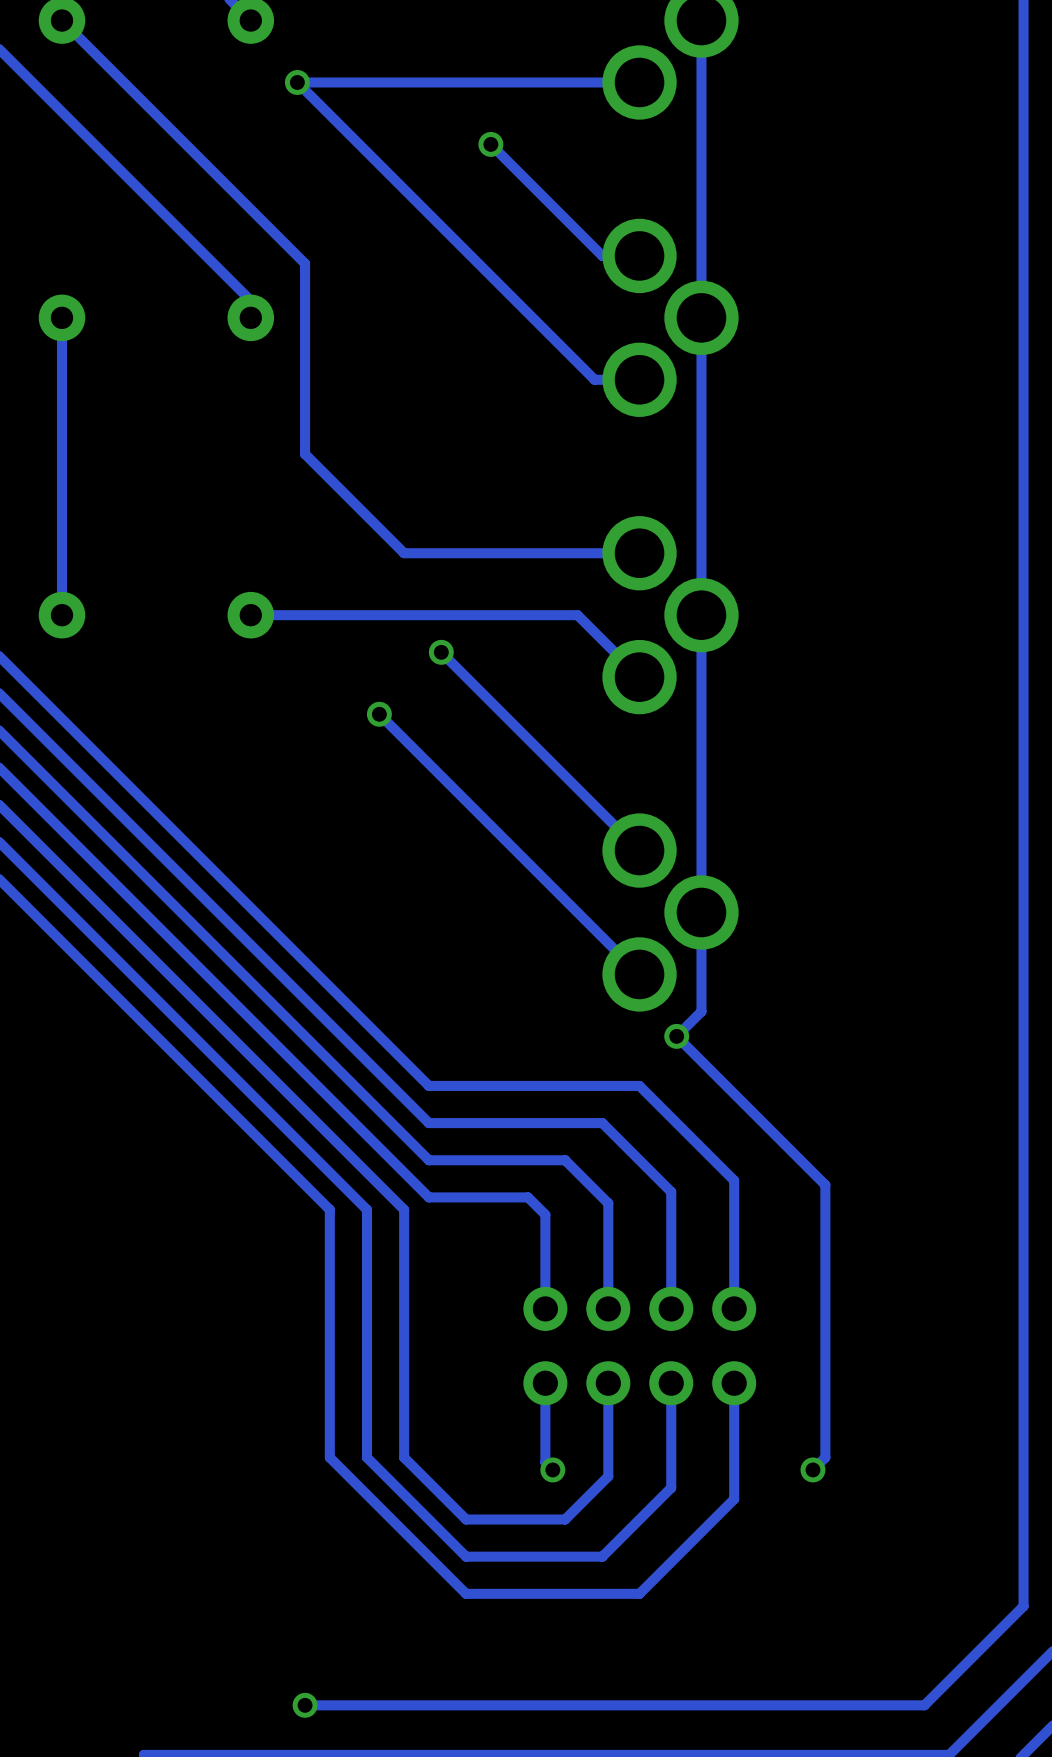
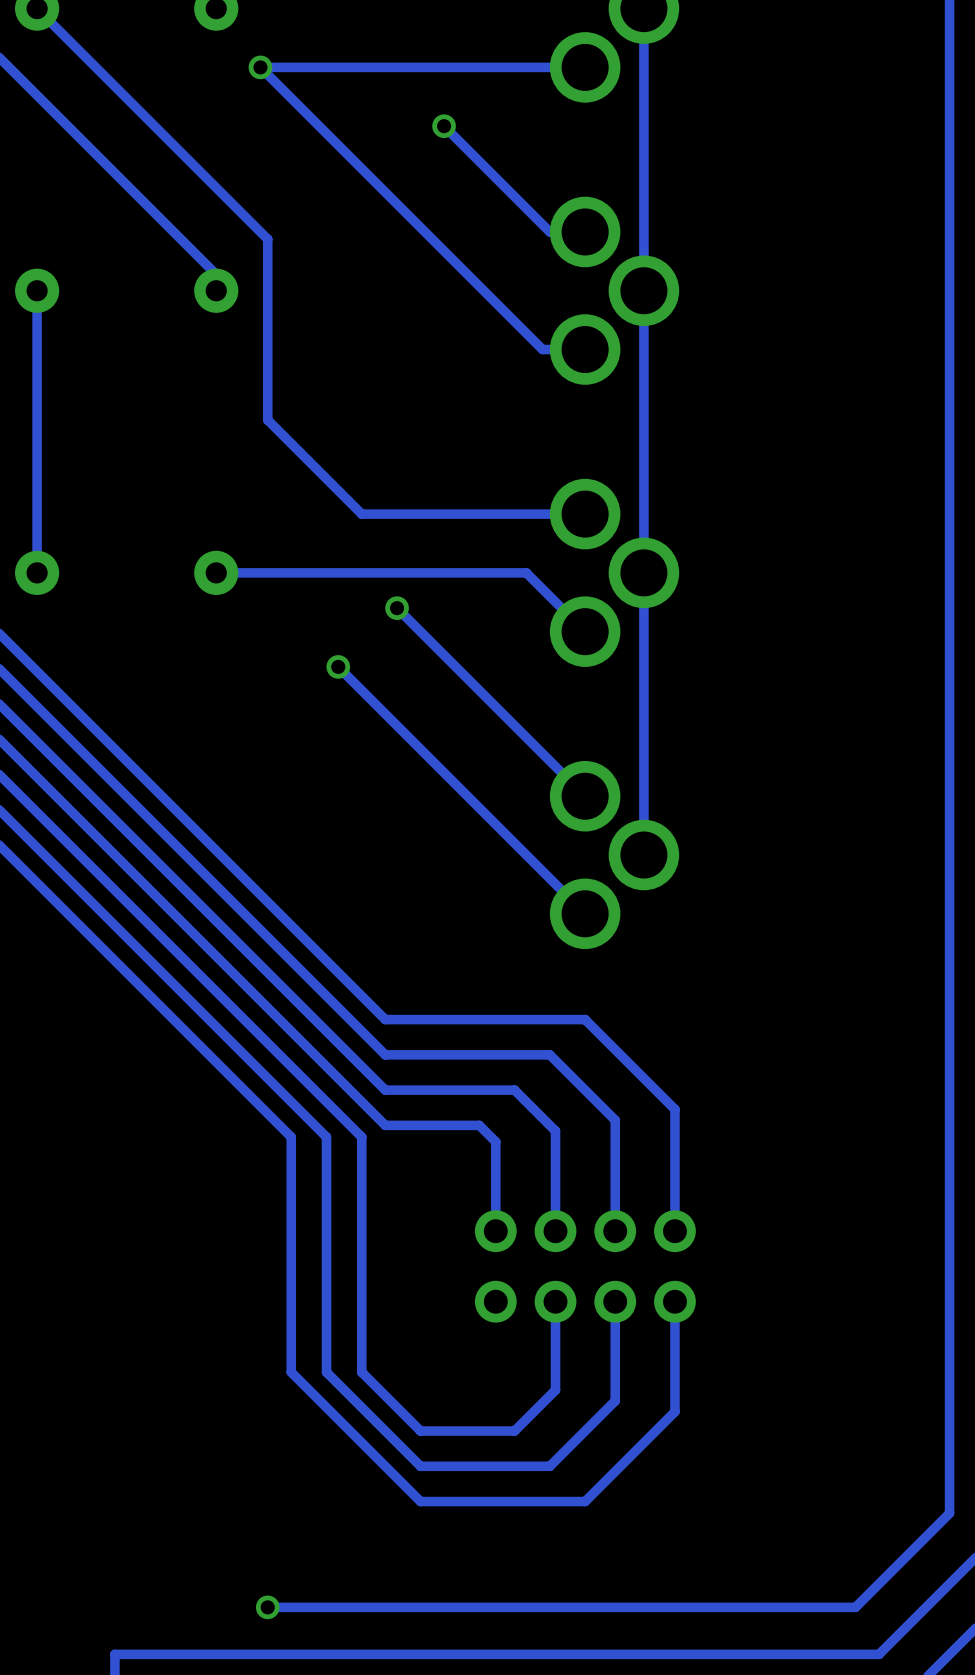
track: (701, 912) (701, 1011) (676, 1036) (825, 1185) (825, 1457) (812, 1469) -> none
via: (676, 1036) -> none
track: (545, 1383) (545, 1462) (552, 1469) -> none
via: (552, 1469) -> none
via: (812, 1469) -> none

